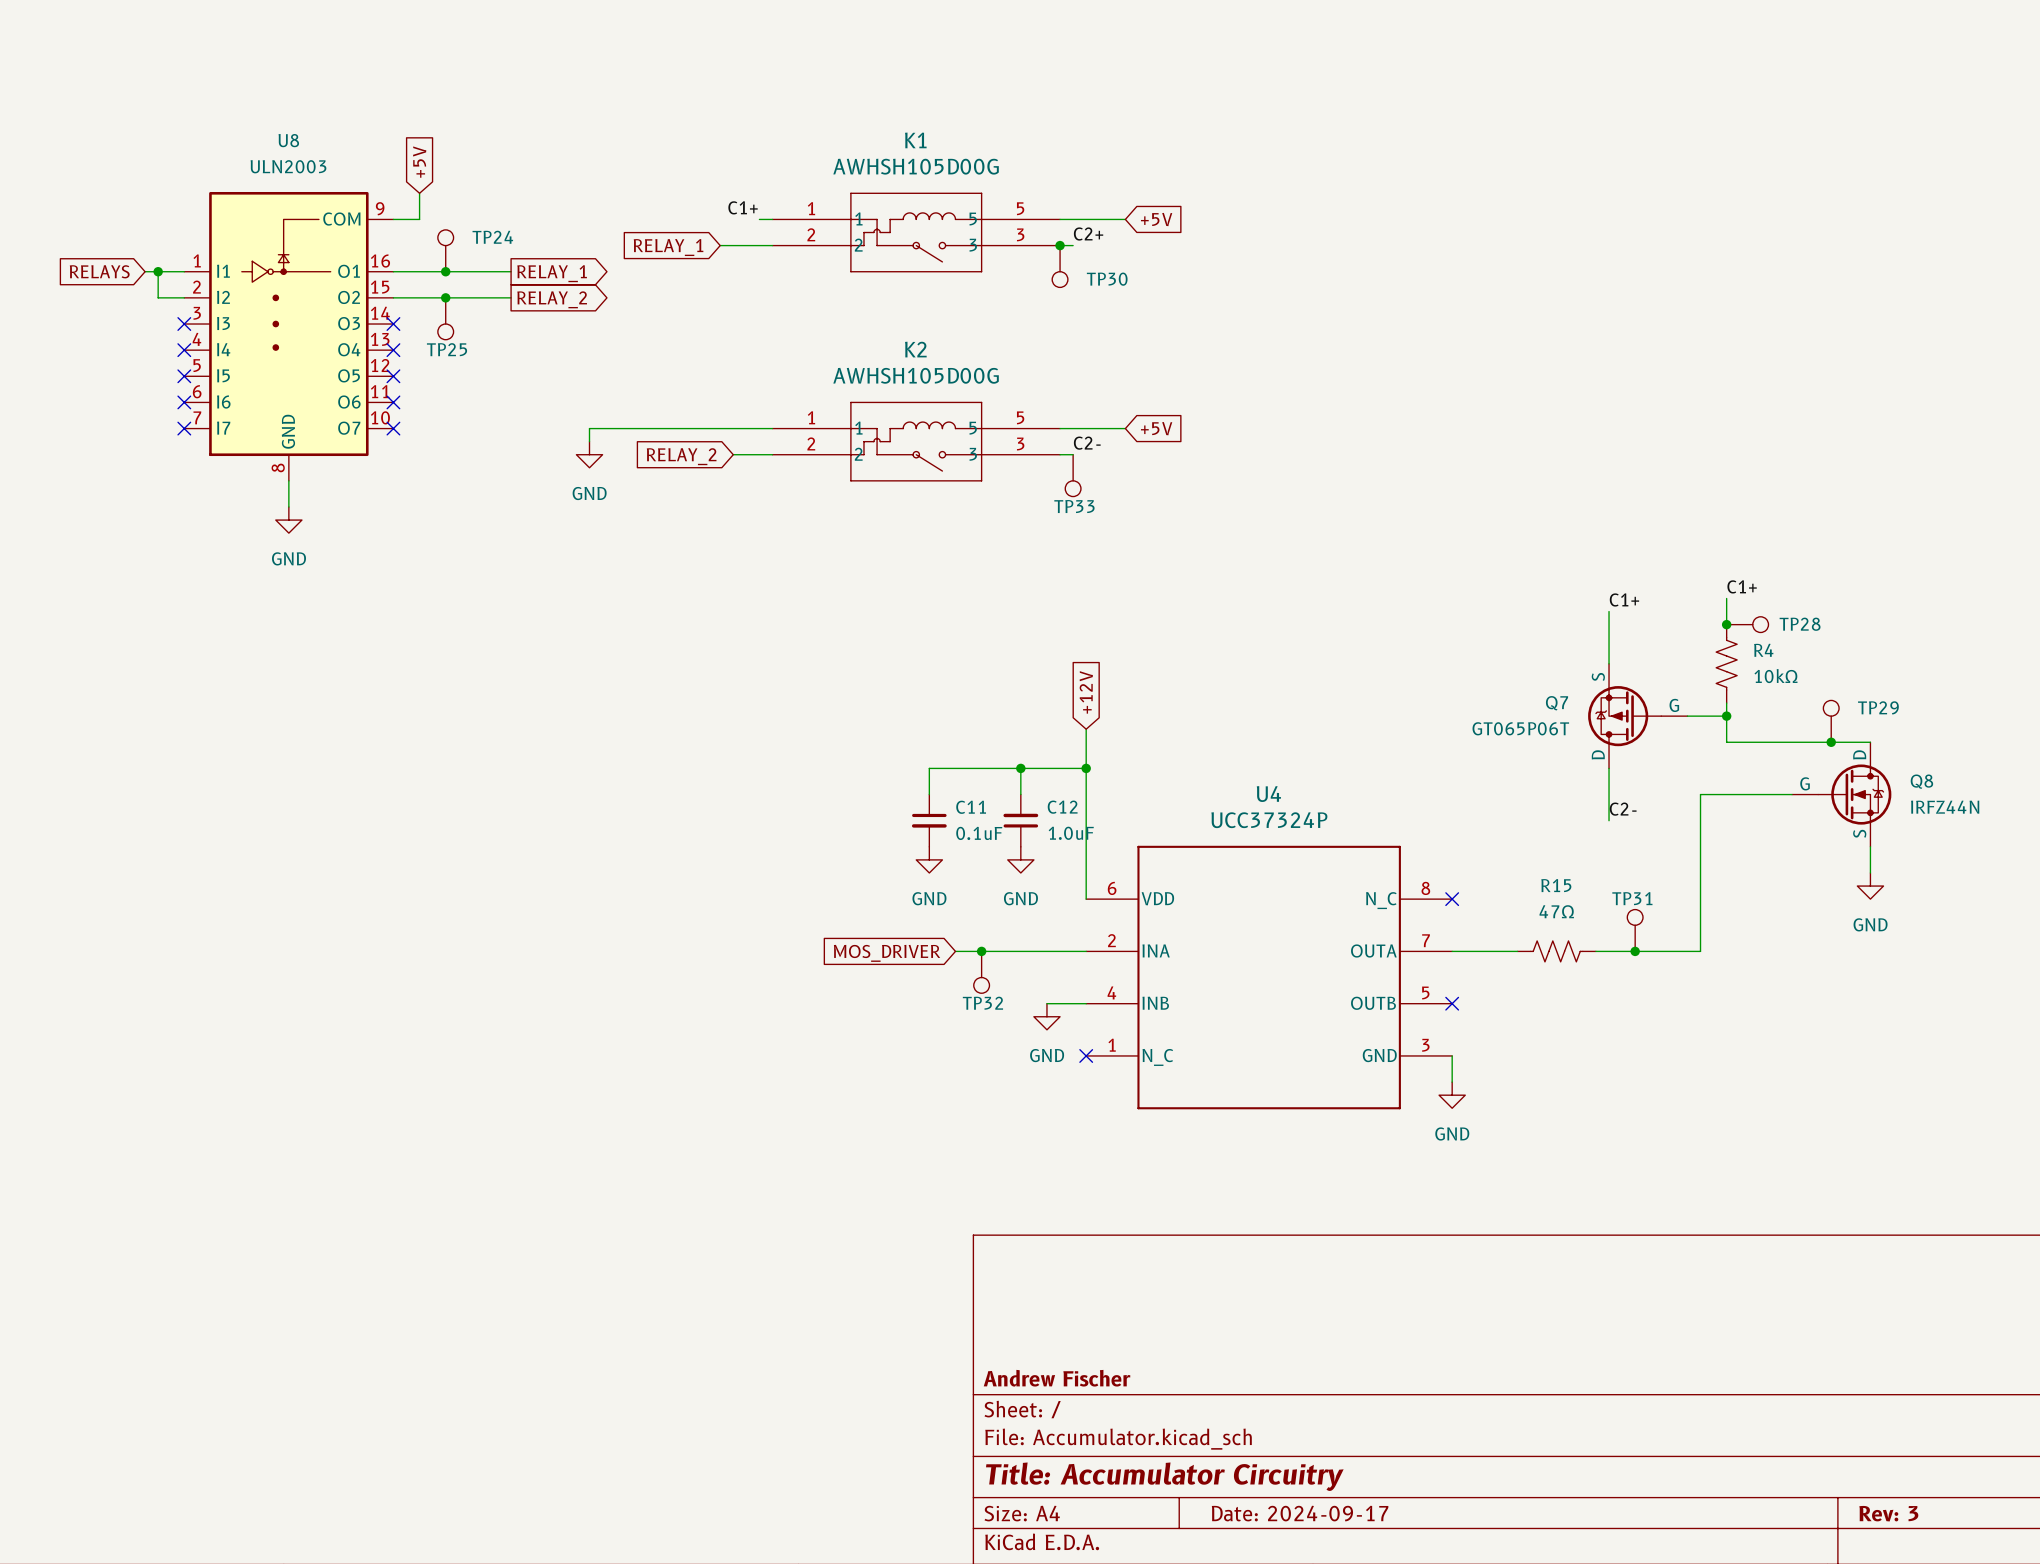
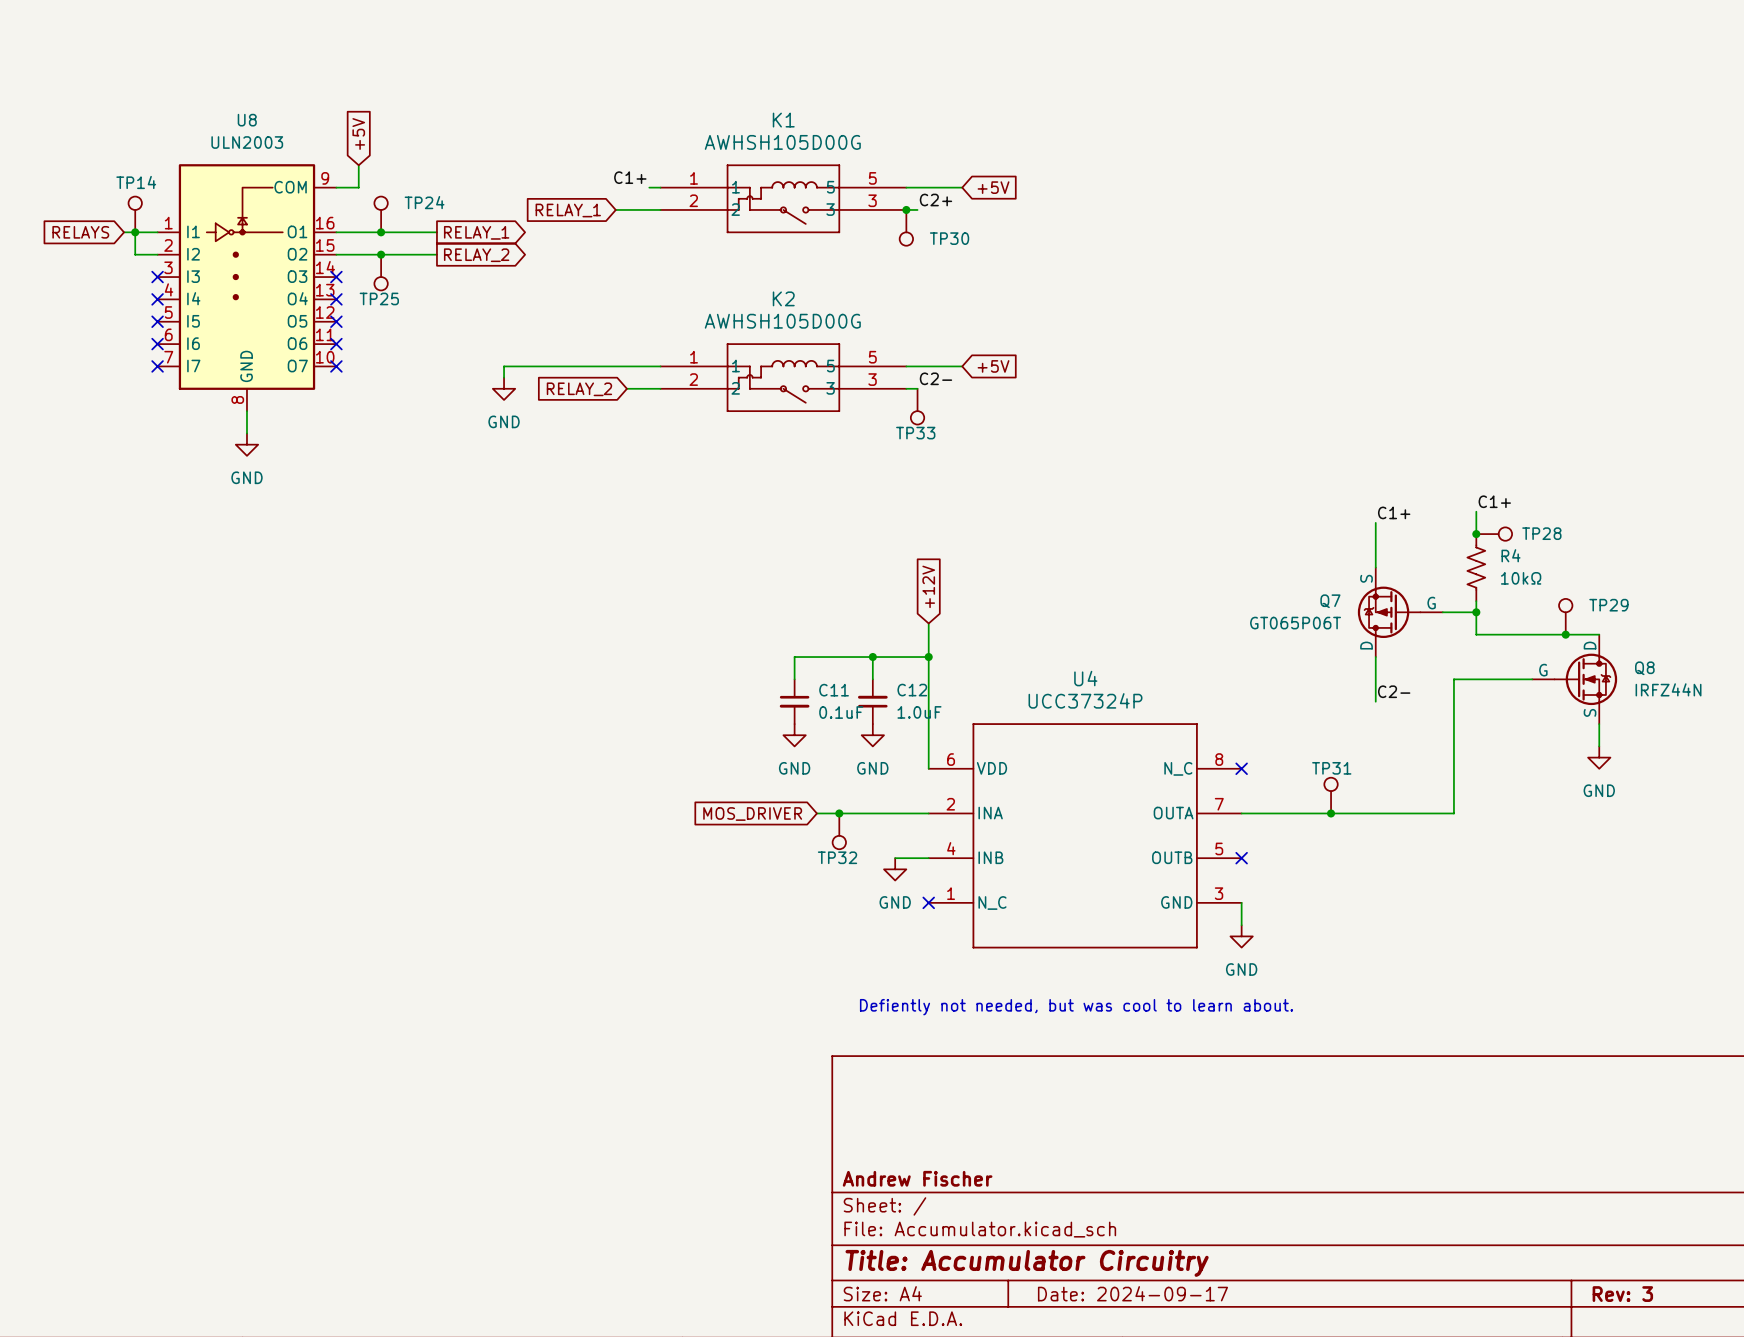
TP14: none -> (135, 214)
TP31 position: (1635, 930) -> (1331, 795)
junction: none -> (1331, 813)
R15: 47Ω (1556, 951) -> none
junction: (1635, 951) -> none
text: none -> Defiently not needed, but was cool to learn about. (1076, 1007)

